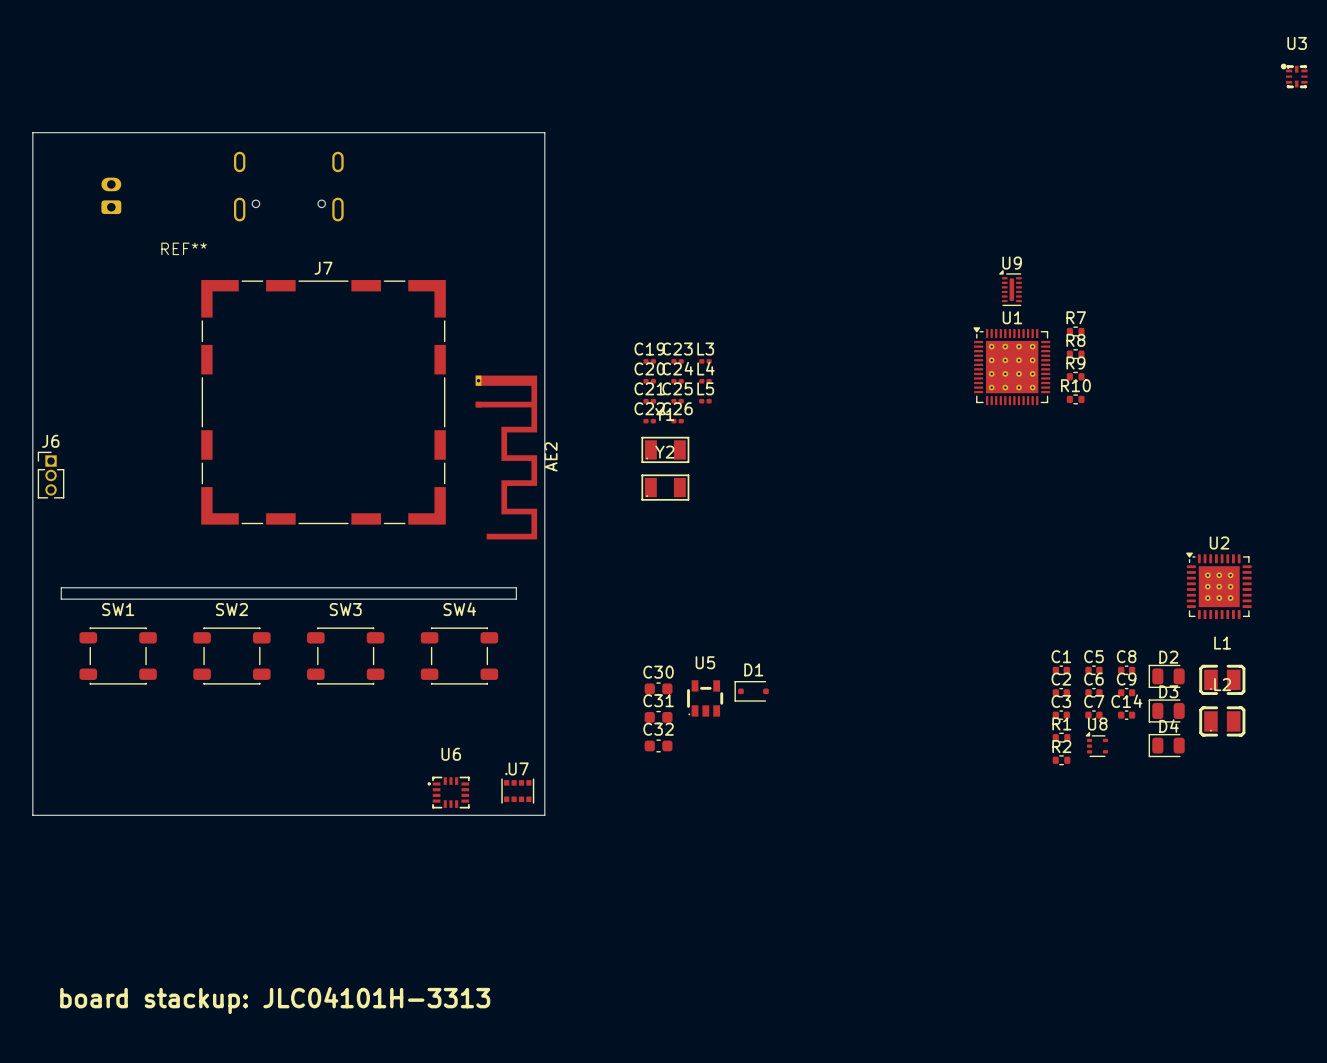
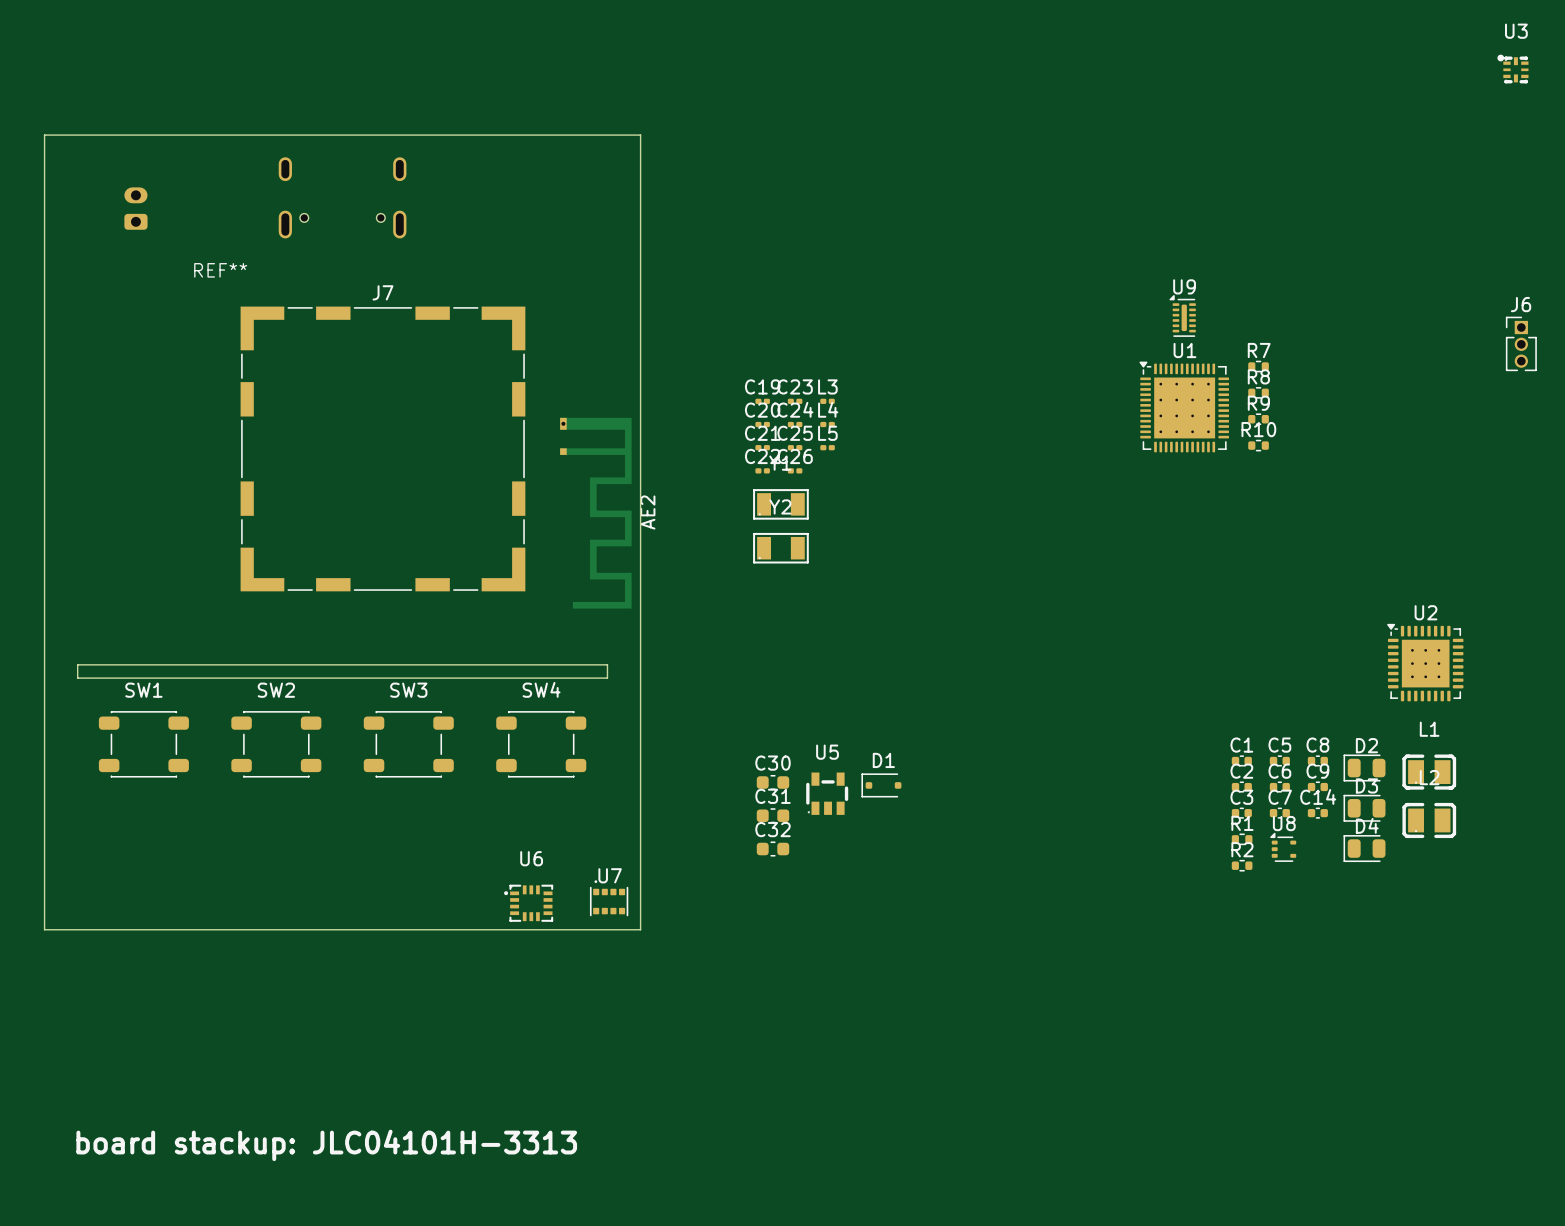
J6 position: (51, 475) -> (1521, 343)

